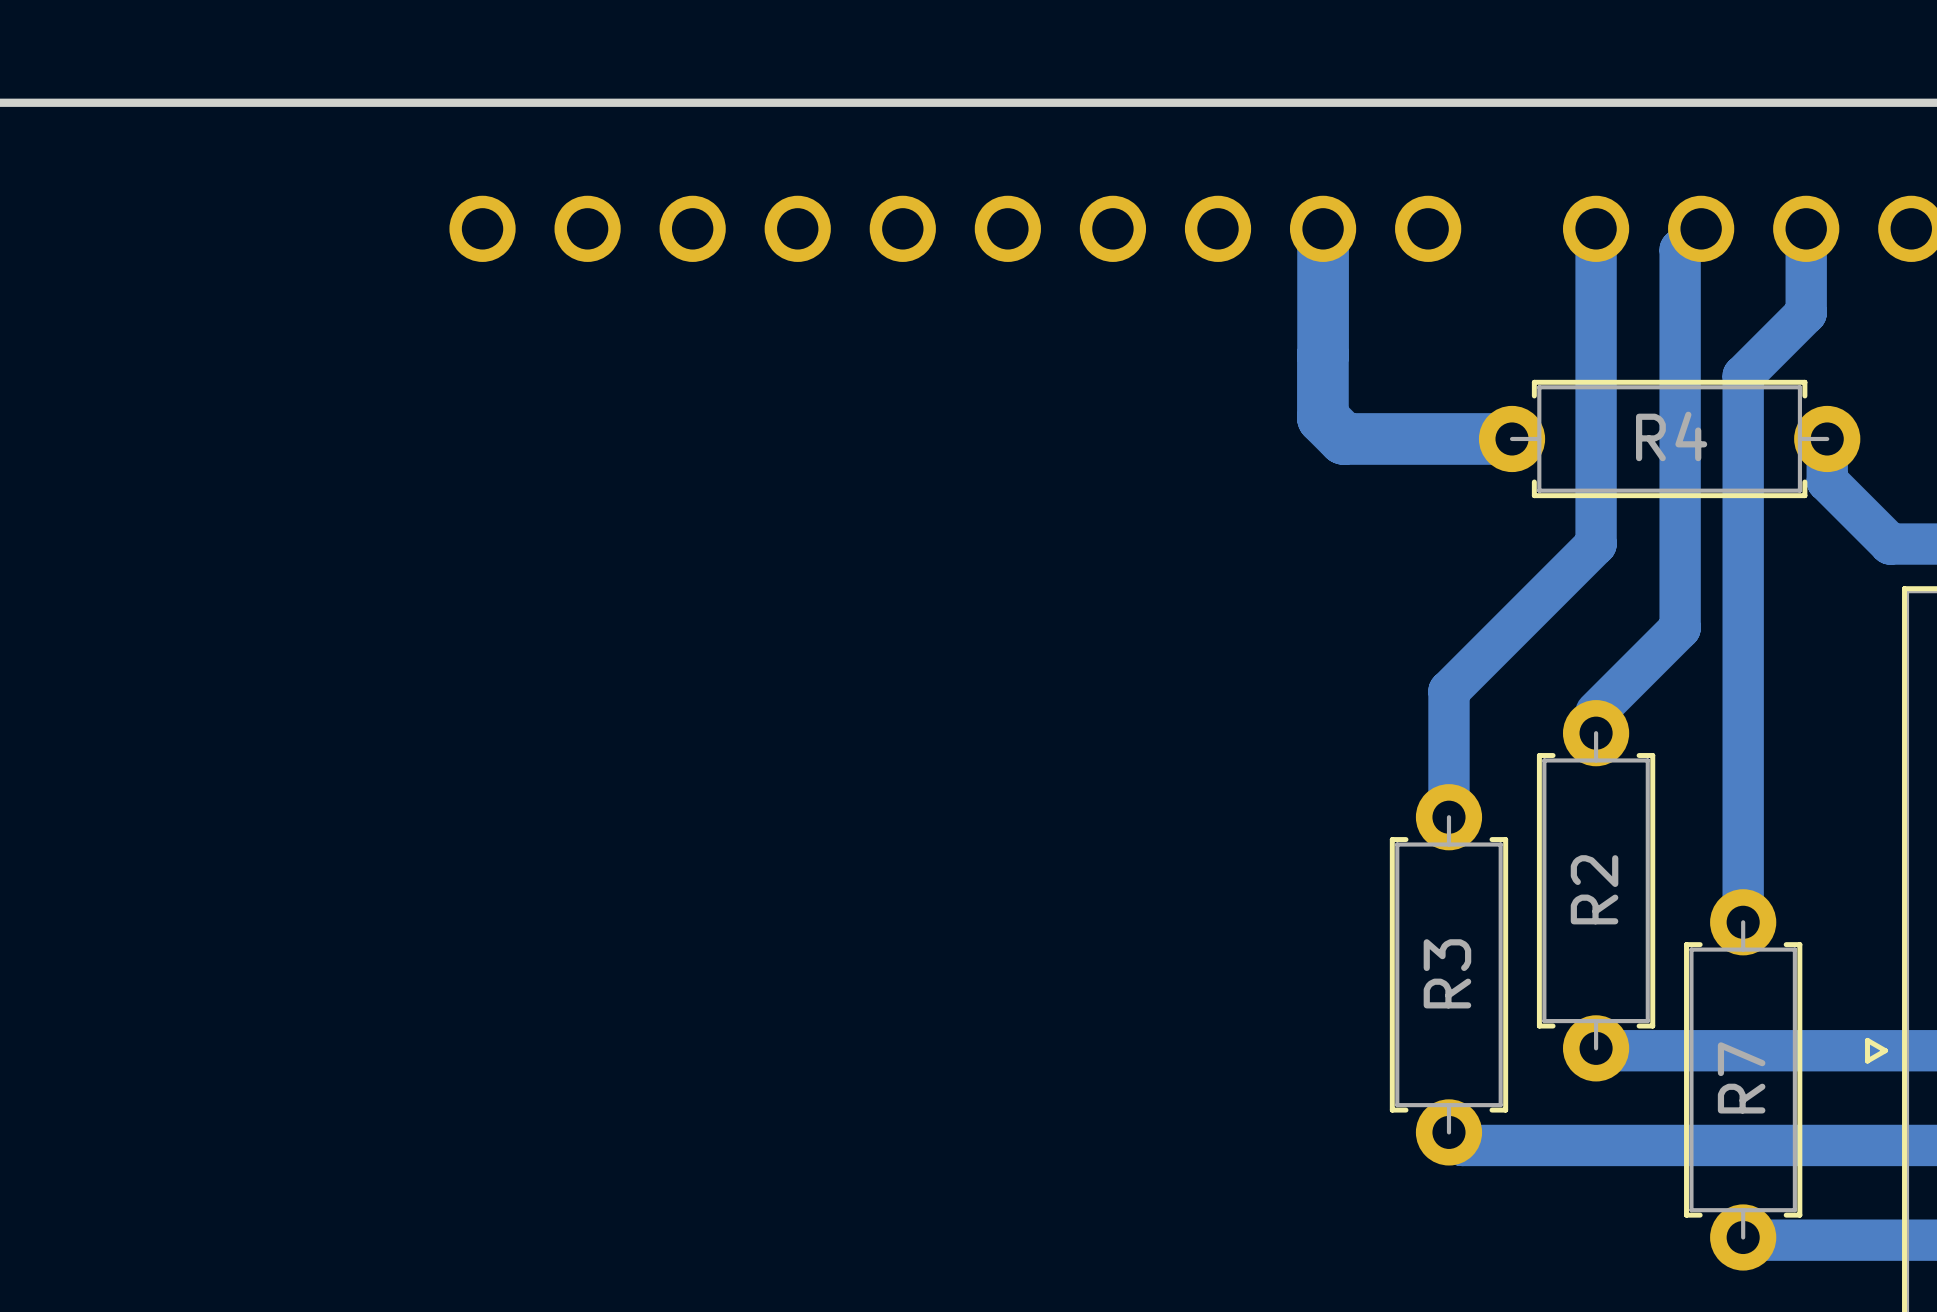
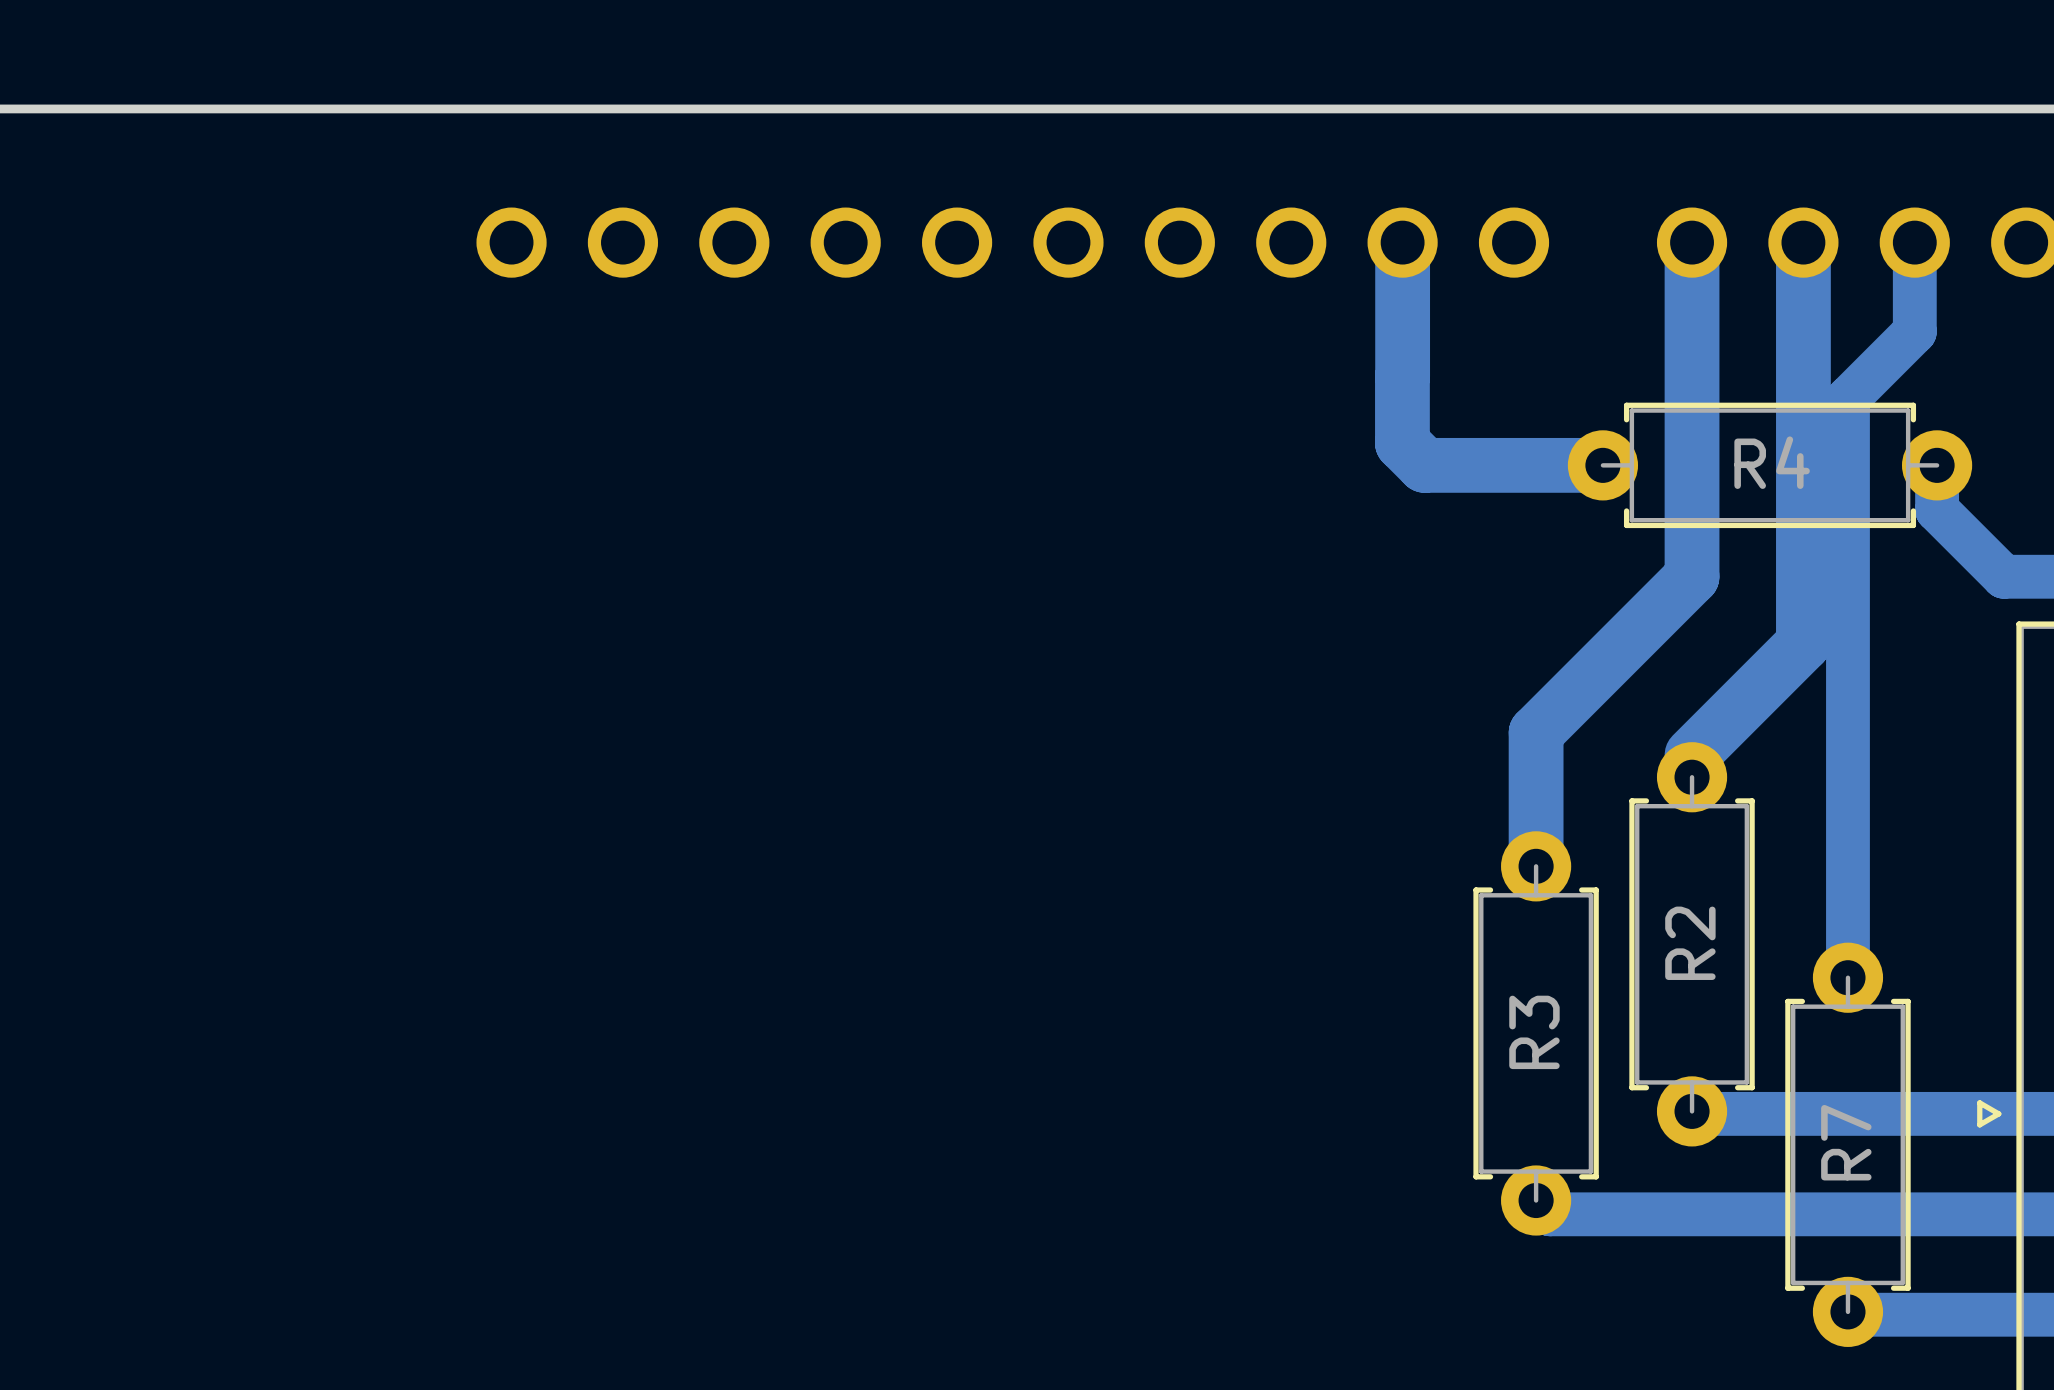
bottom track width: thin (1596, 228) (1596, 544) (1448, 691) (1448, 817) -> thick (1692, 242) (1692, 576) (1536, 732) (1536, 866)
bottom track: (1701, 228) (1680, 249) (1680, 628) -> (1803, 242) (1803, 643) (1781, 665)
bottom track width: thin (1680, 628) (1596, 712) -> thick (1781, 665) (1692, 754)

